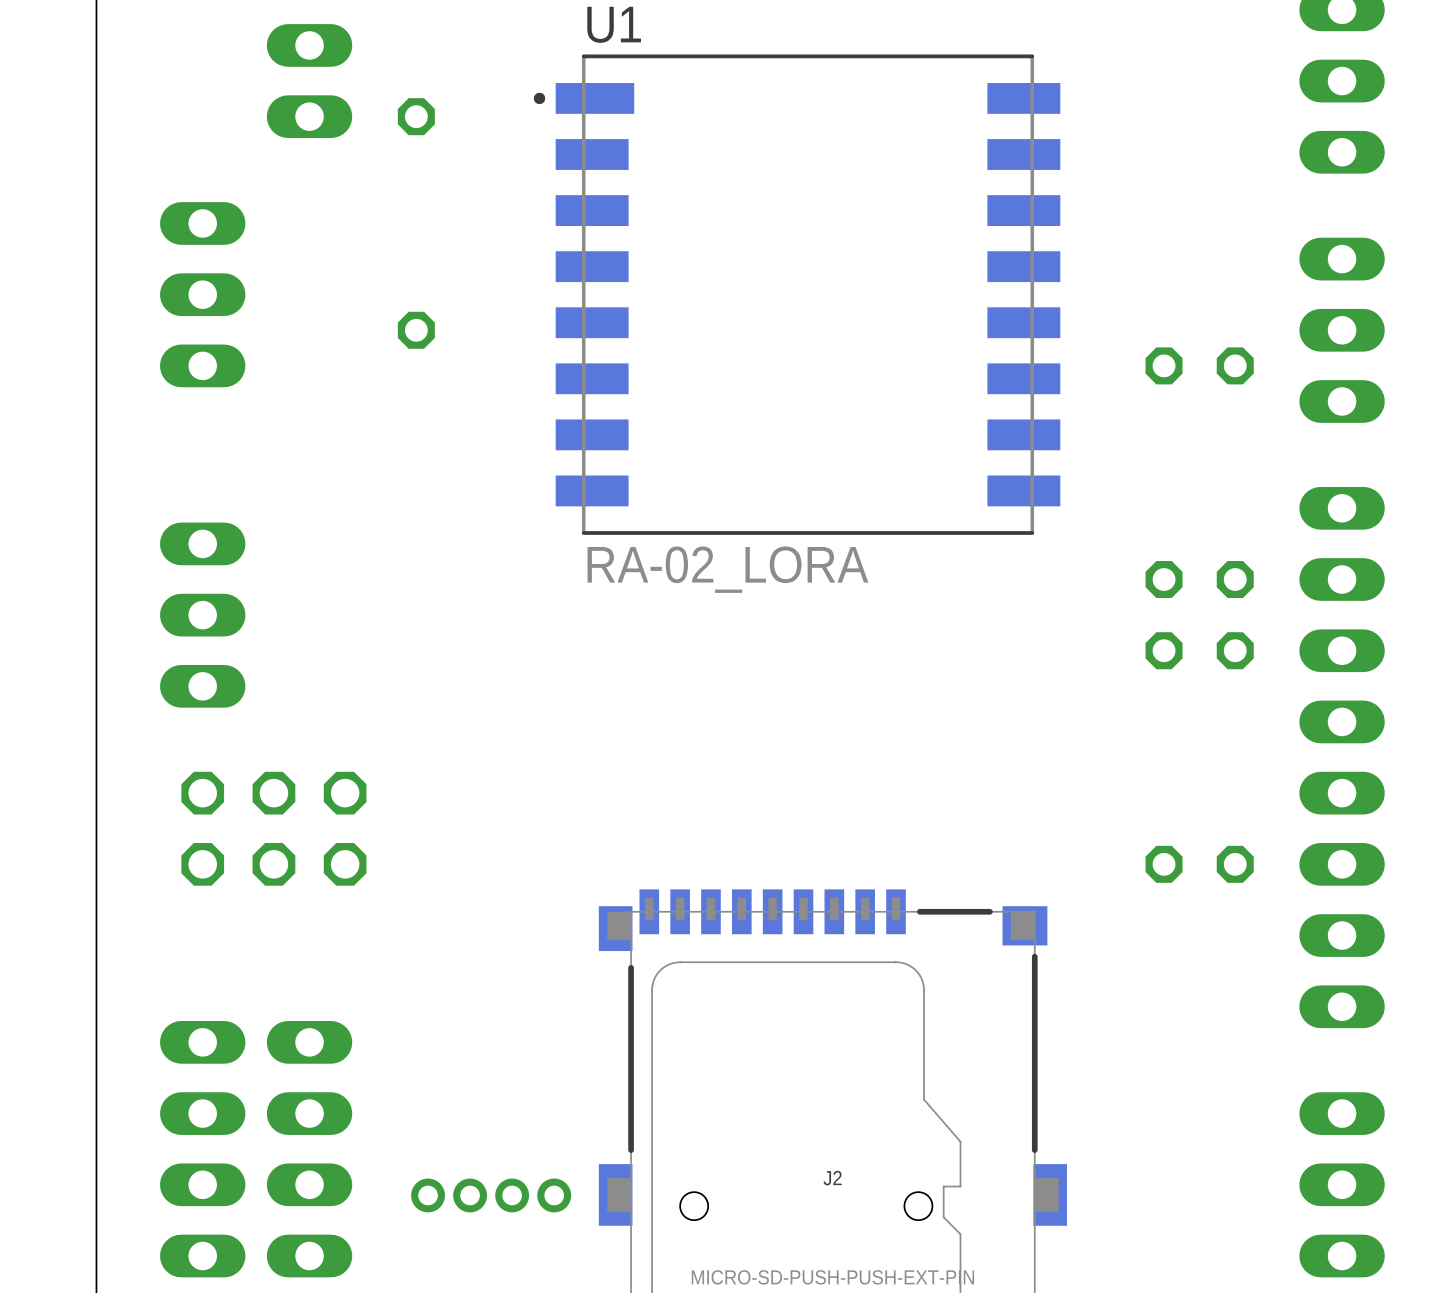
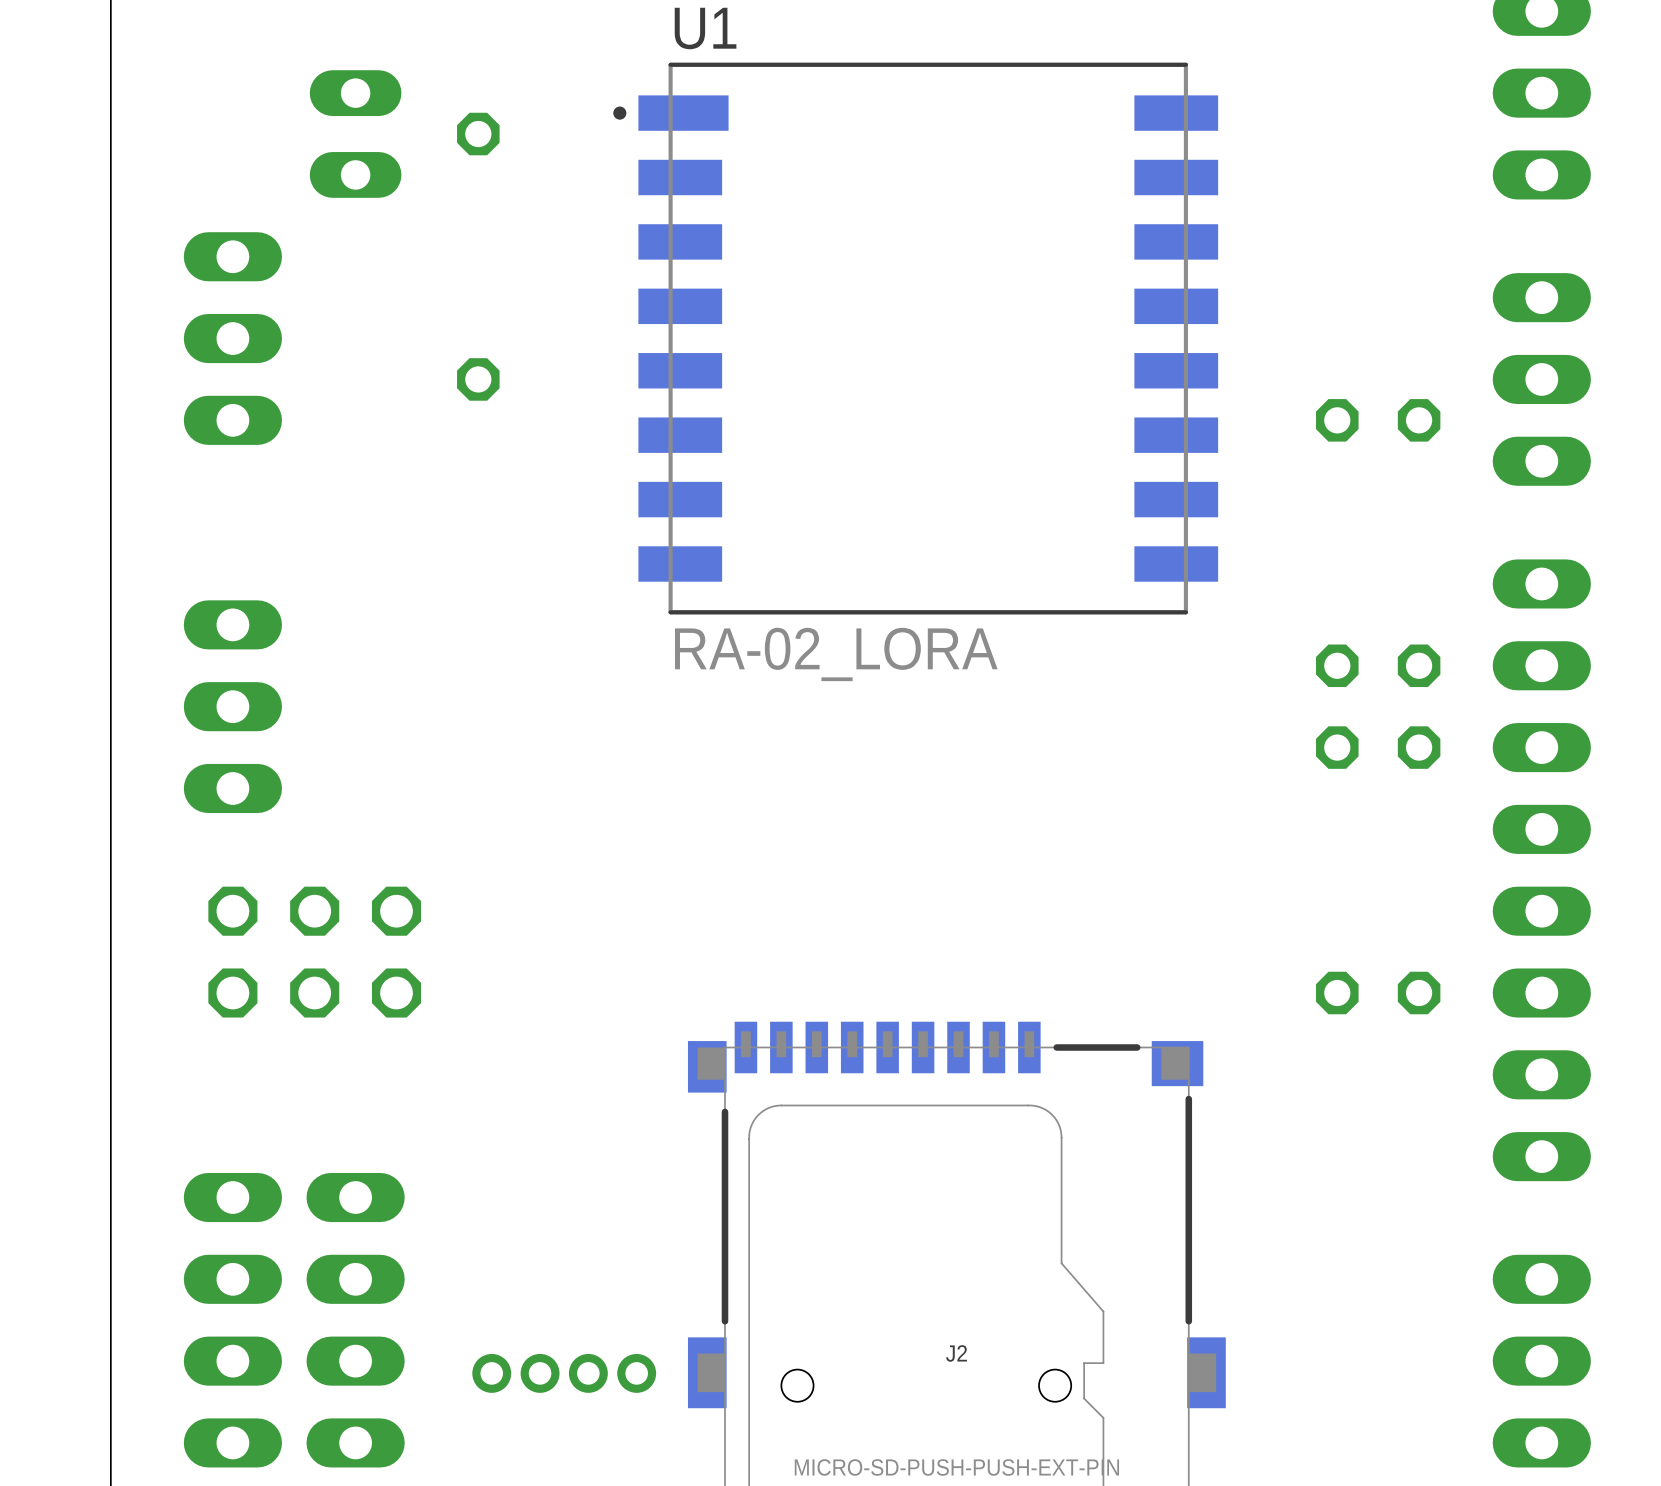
part: (309, 81) -> none
part: none -> (355, 134)

